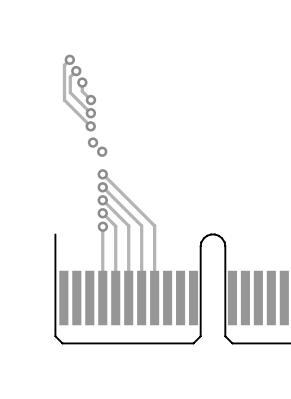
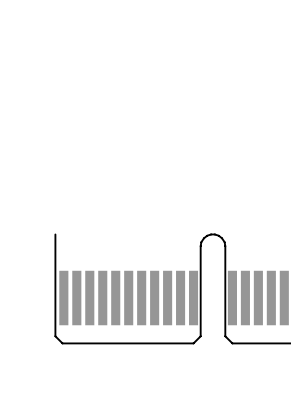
track: (69, 59) (64, 65) (64, 100) (90, 126) -> none
via: (69, 59) -> none
track: (76, 71) (70, 77) (70, 92) (90, 113) -> none
via: (76, 71) -> none
track: (82, 82) (82, 91) (90, 100) -> none
via: (82, 82) -> none
via: (90, 100) -> none
via: (90, 113) -> none
via: (90, 126) -> none
via: (93, 142) -> none
via: (102, 151) -> none
track: (102, 174) (154, 225) (154, 298) -> none
via: (102, 174) -> none
track: (102, 187) (141, 225) (141, 298) -> none
via: (102, 187) -> none
track: (102, 200) (128, 225) (128, 298) -> none
via: (102, 200) -> none
track: (102, 213) (115, 226) (115, 298) -> none
via: (102, 213) -> none
track: (102, 226) (102, 298) -> none
via: (102, 226) -> none

